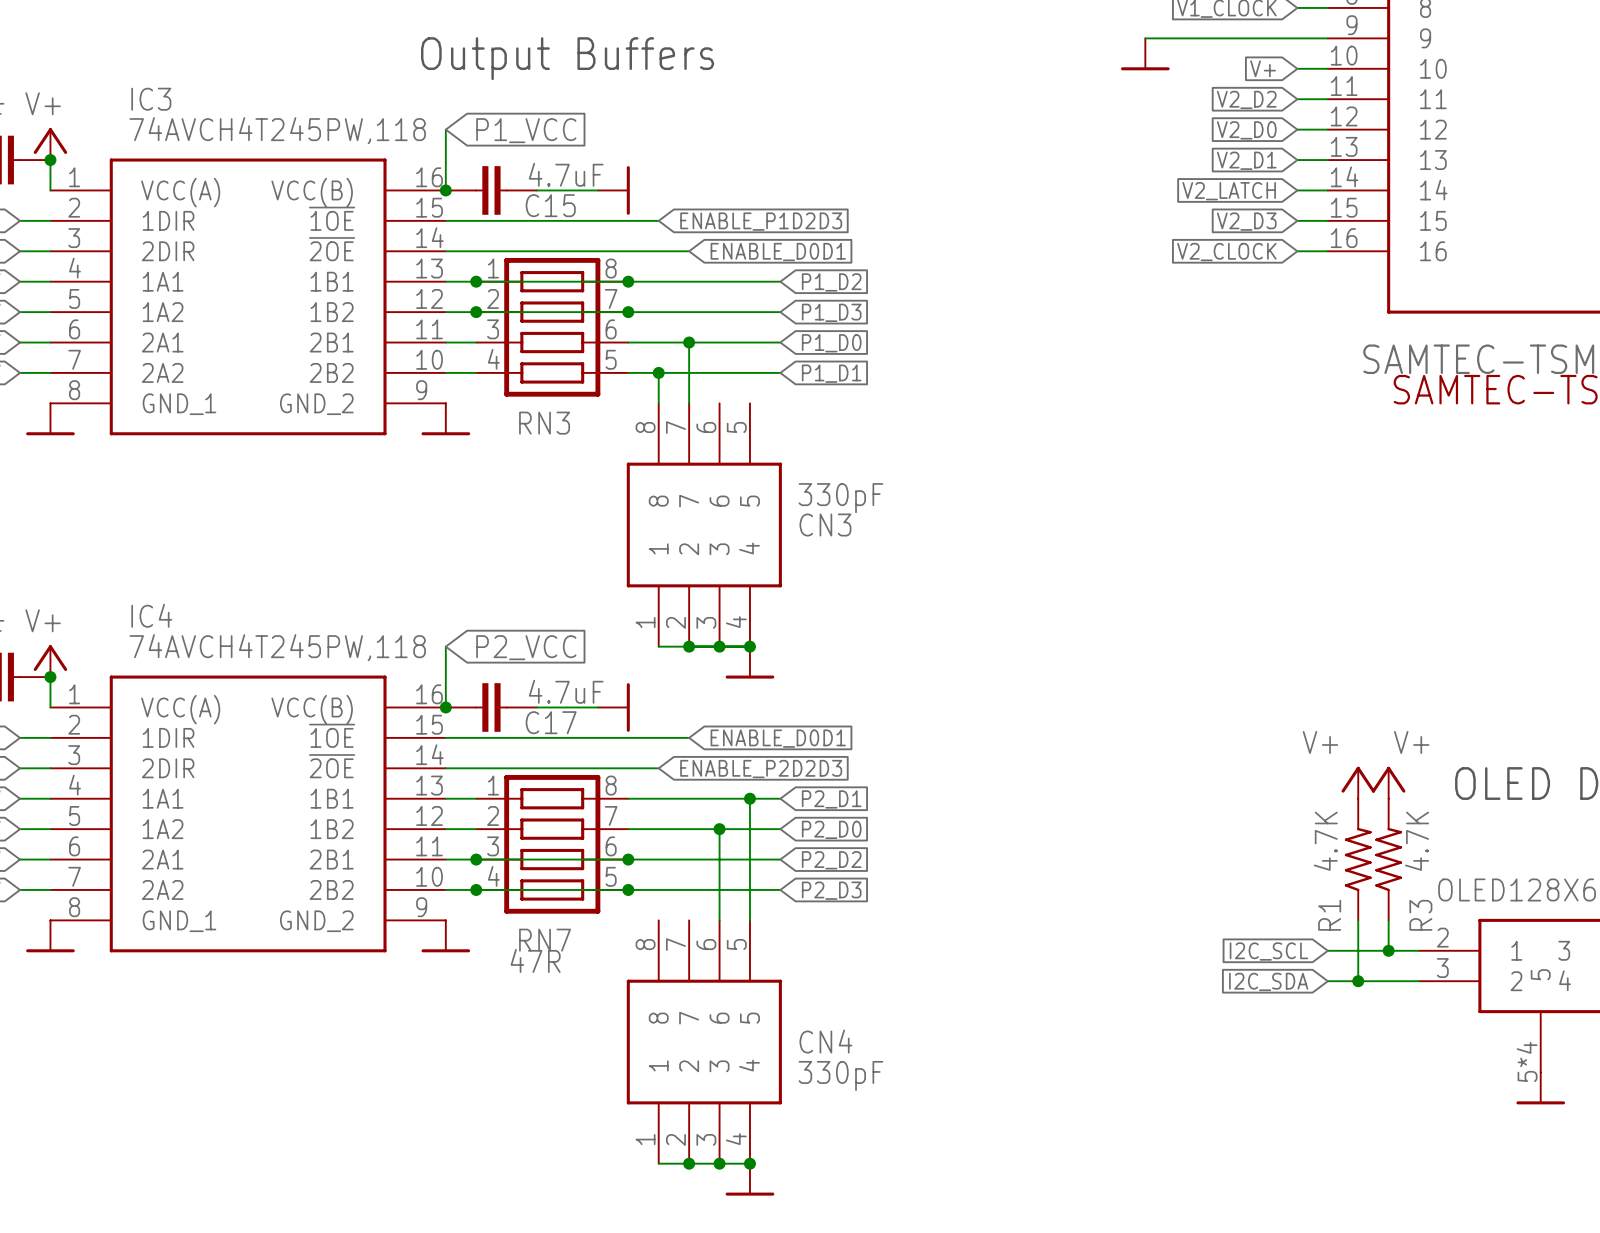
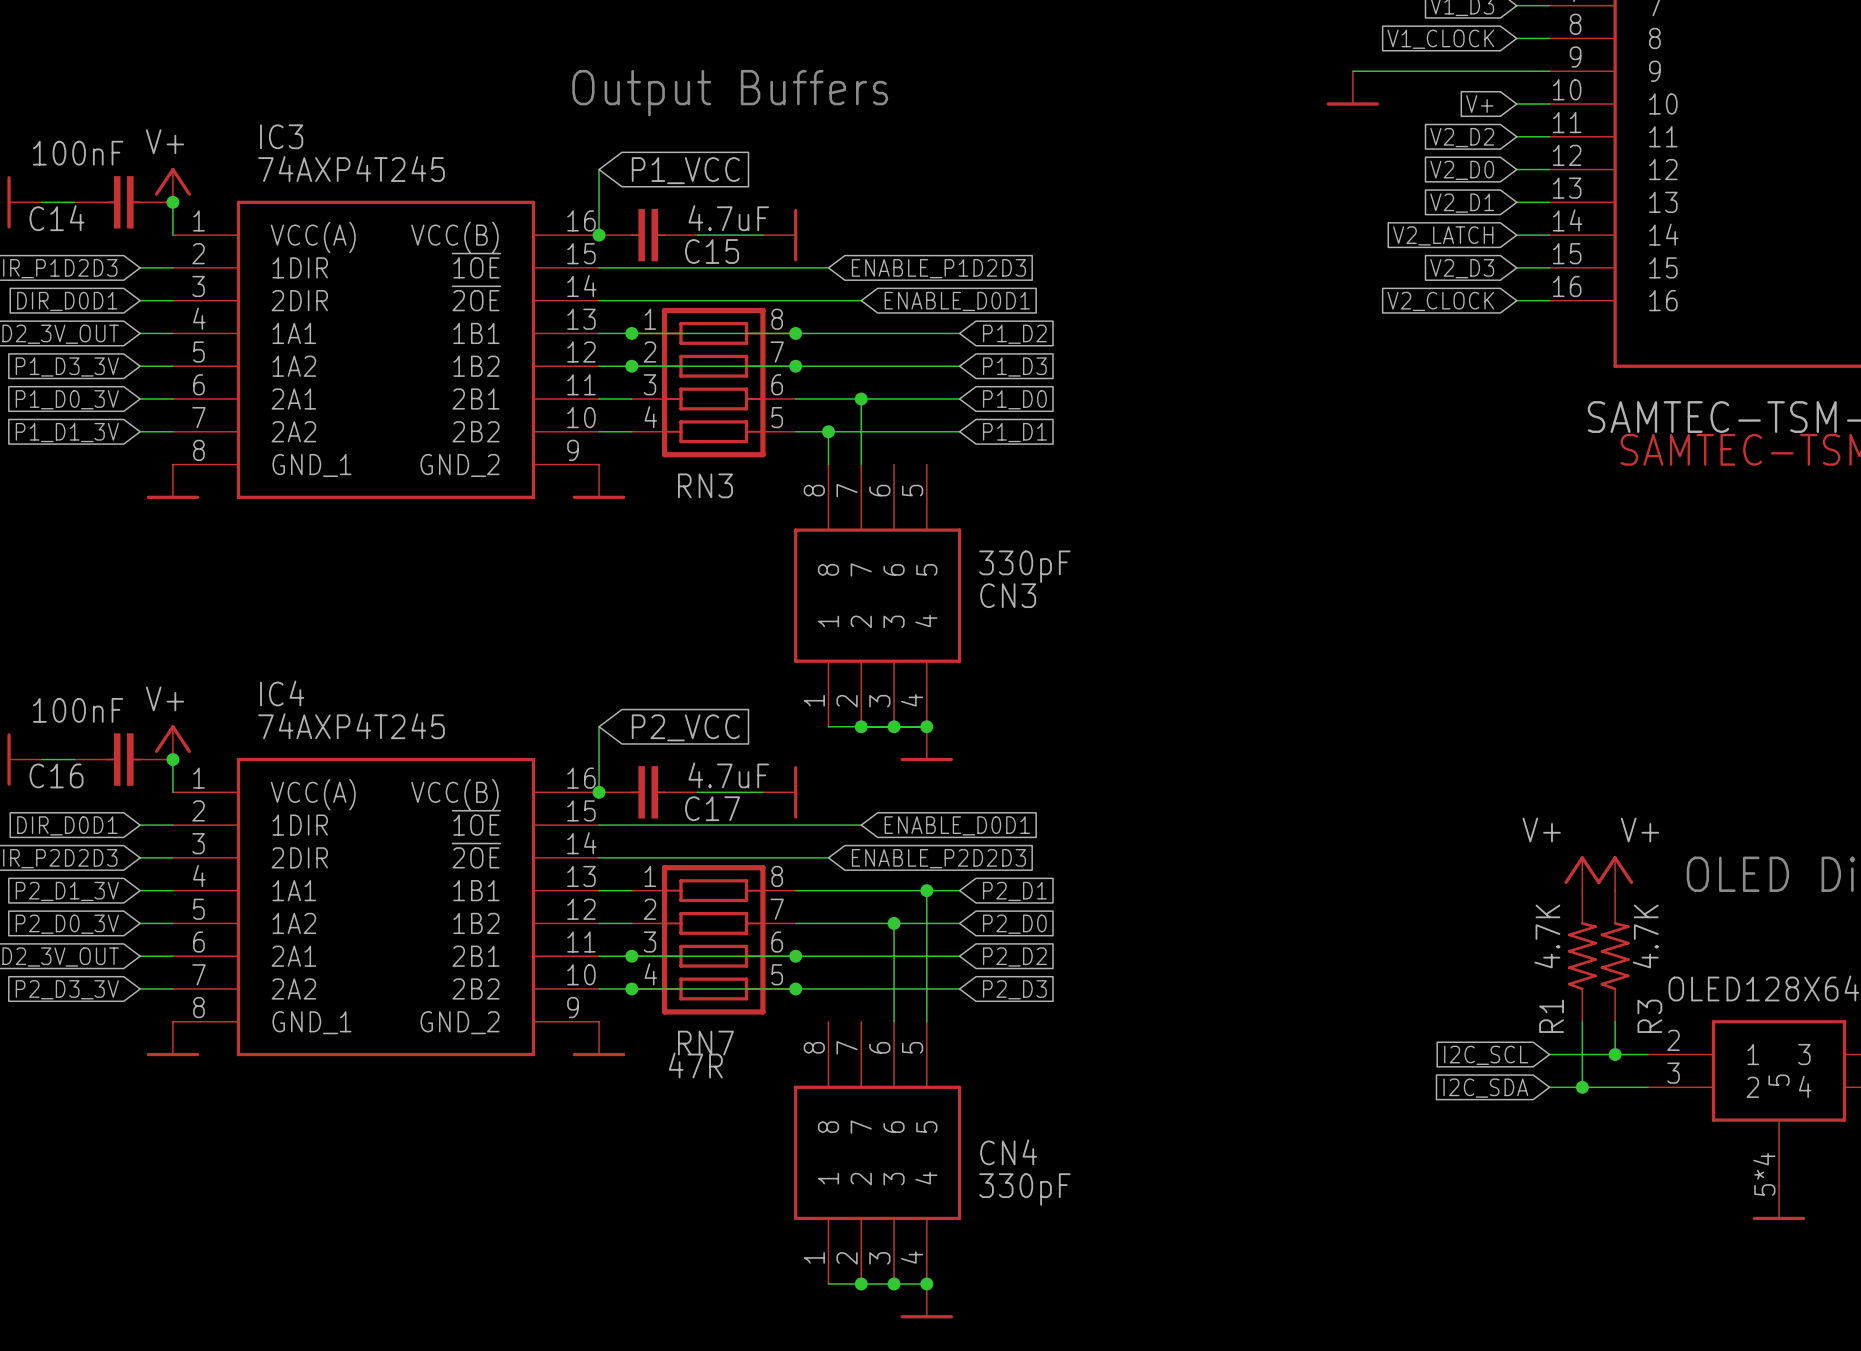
IC3 value: 74AVCH4T245PW,118 (277, 130) -> 74AXP4T245 (351, 169)
IC4 value: 74AVCH4T245PW,118 (277, 647) -> 74AXP4T245 (351, 726)

